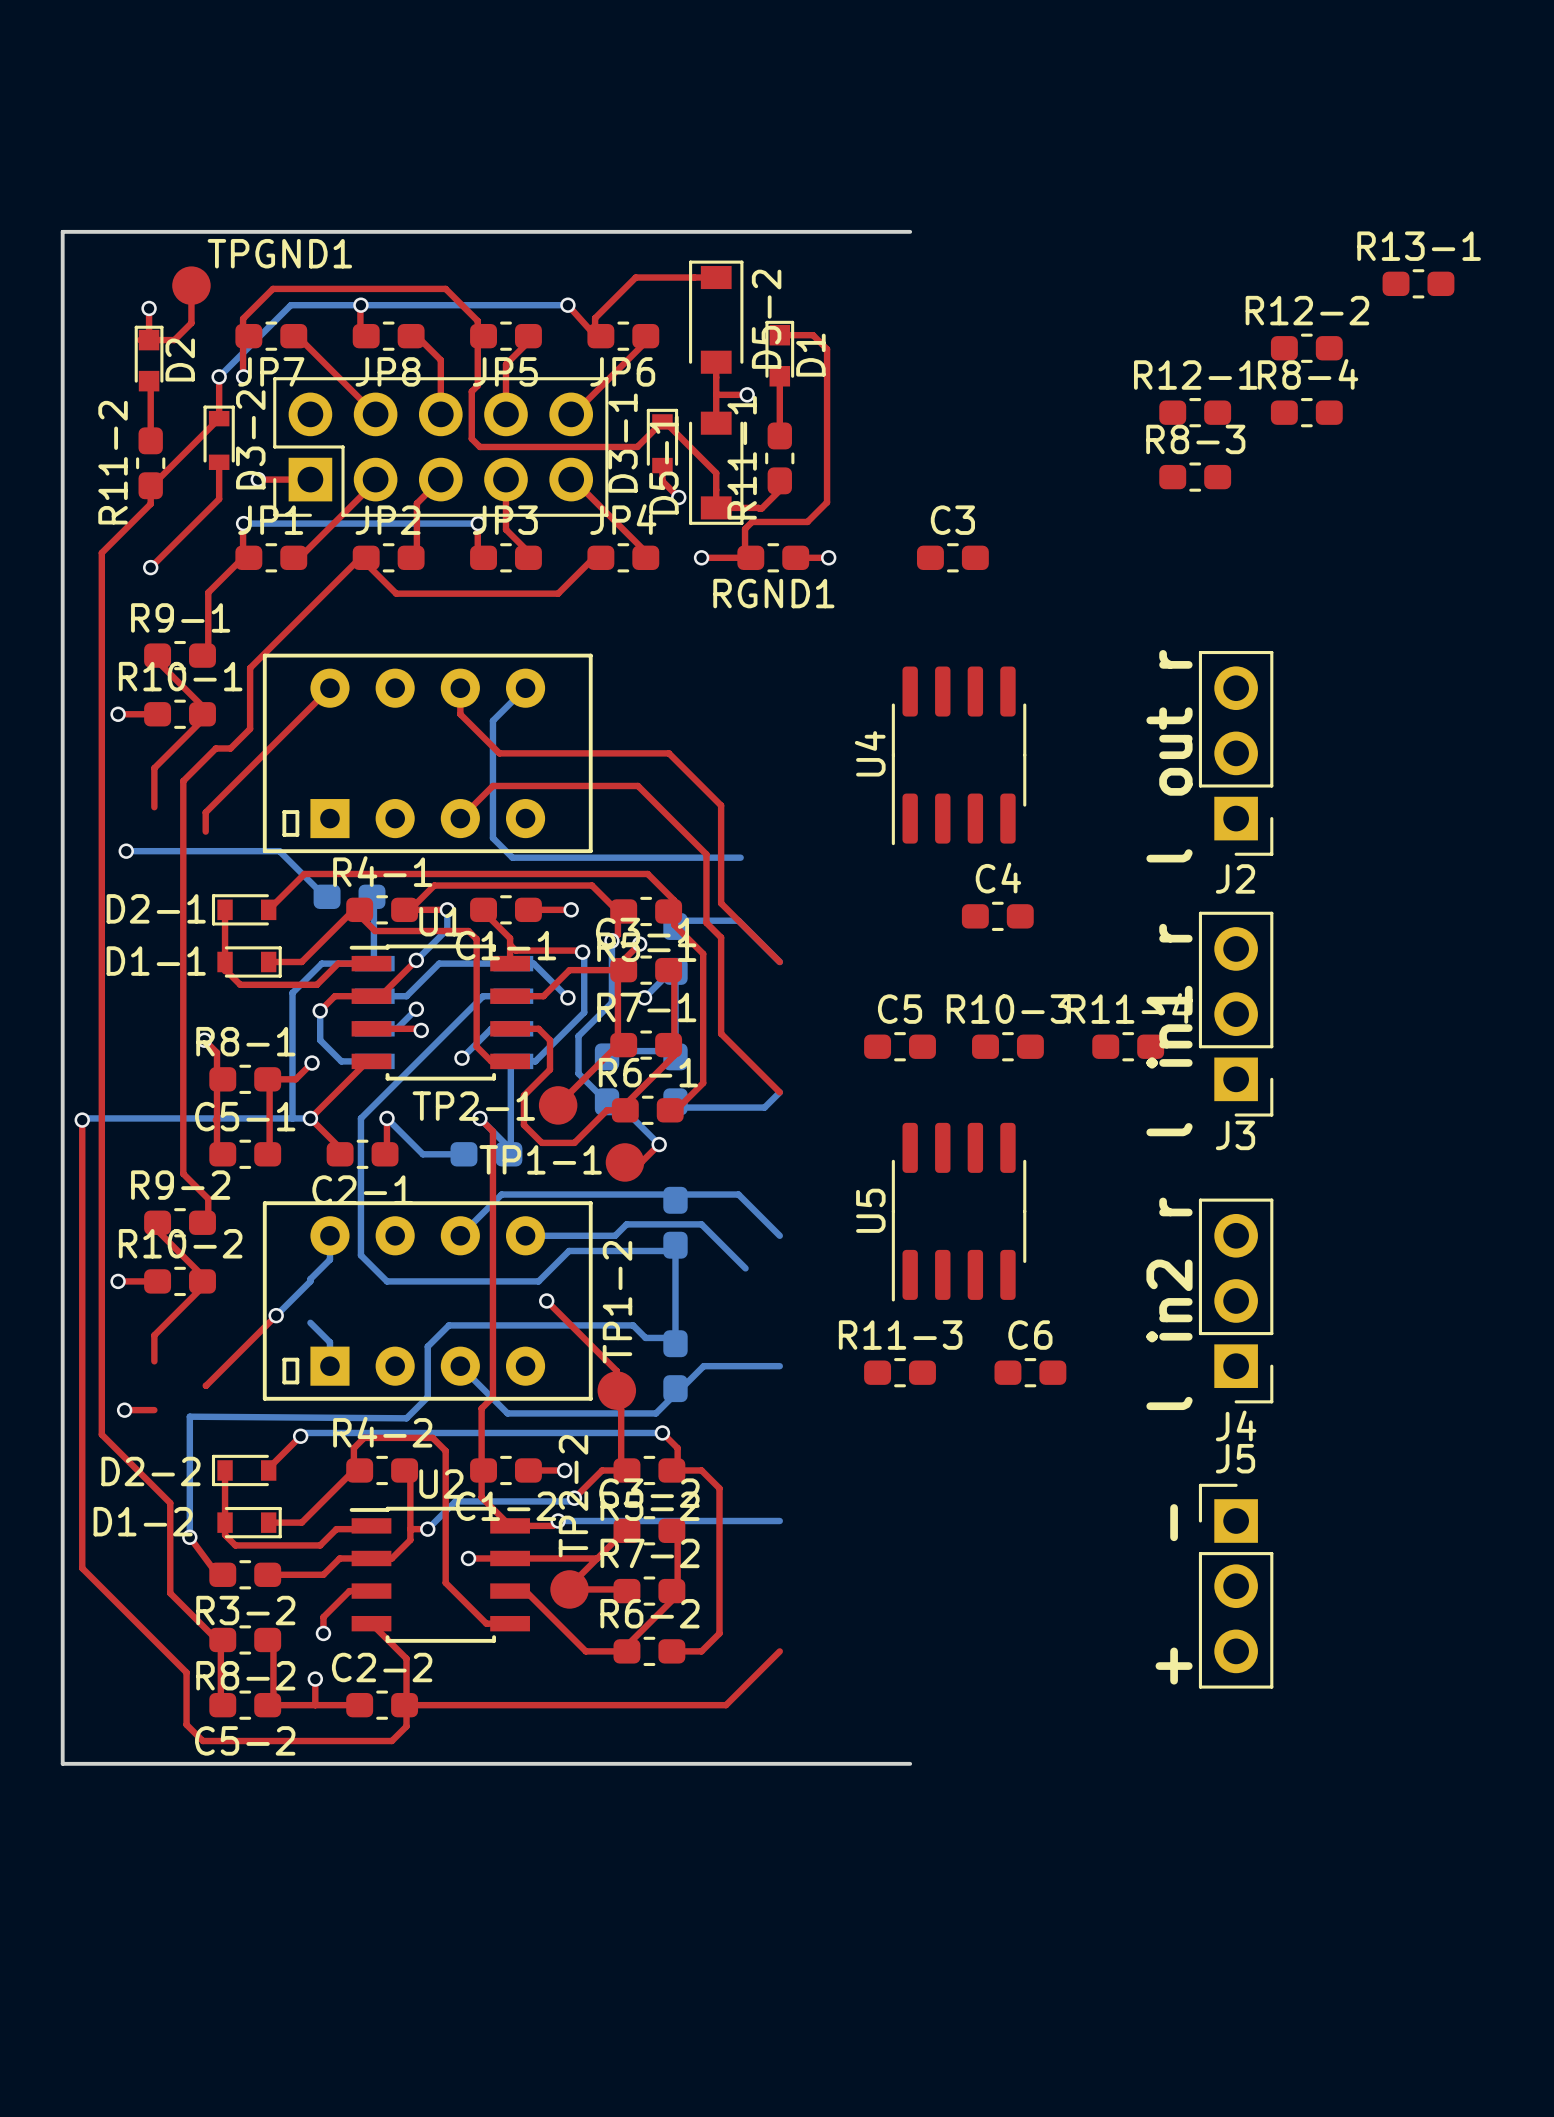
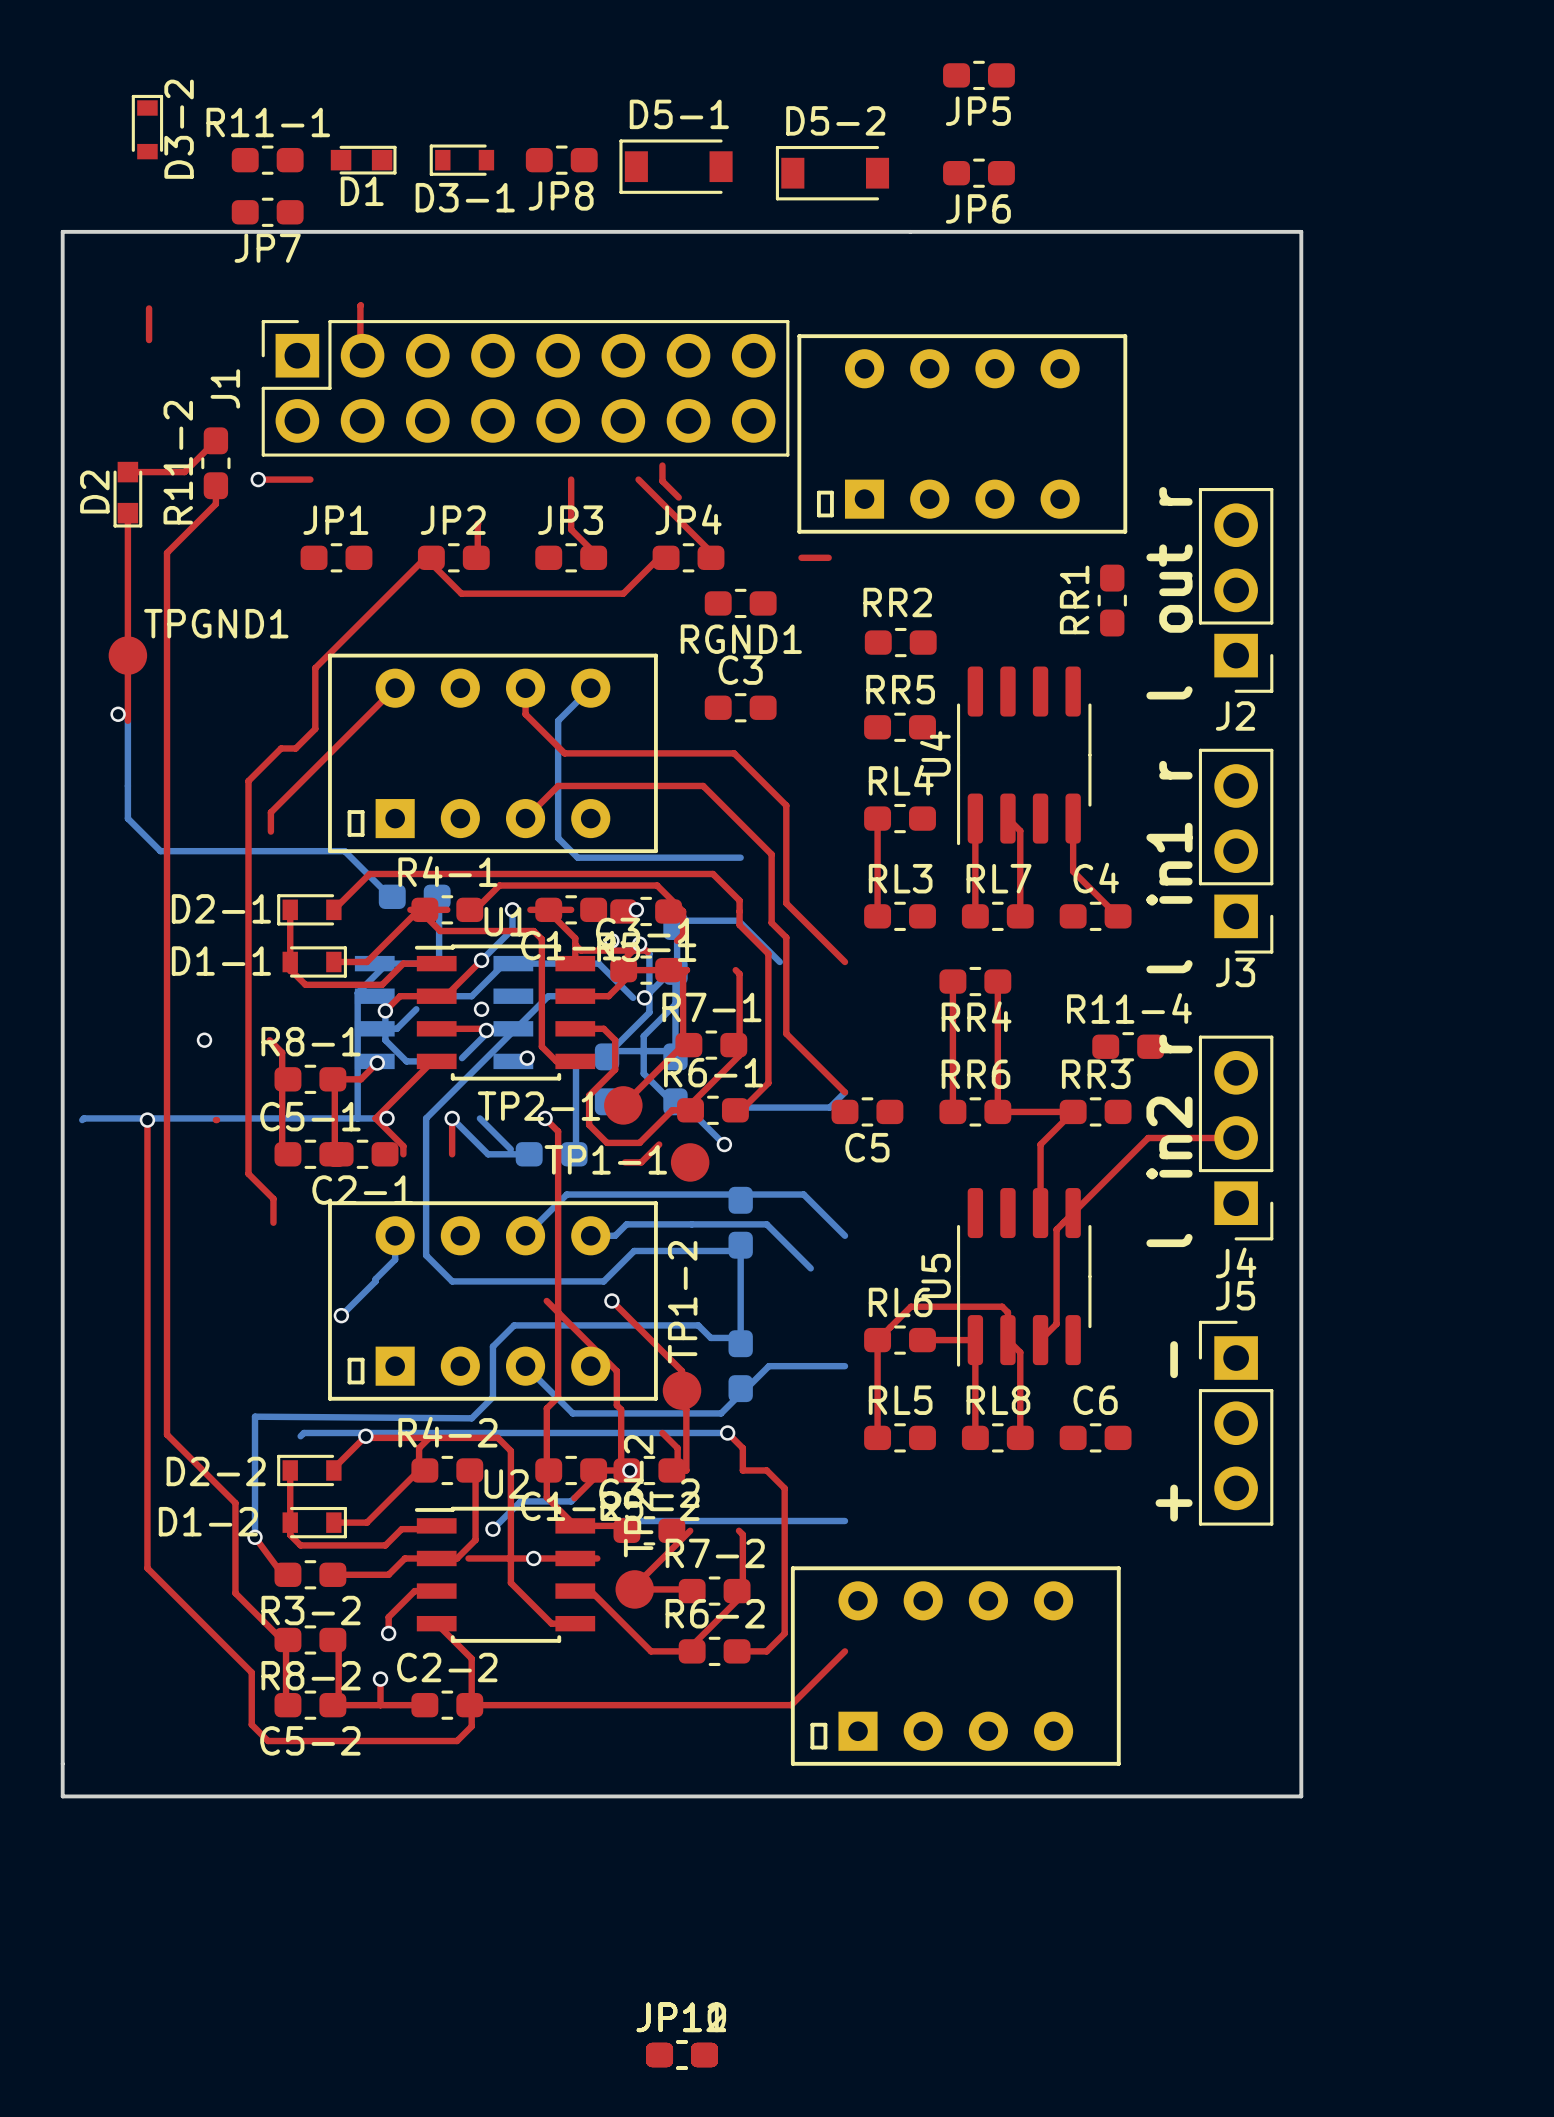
top track: (716, 277) (635, 277) (595, 318) (595, 336) (567, 305) -> none
R13-1: (1418, 283) -> none
top track: (191, 285) (191, 323) (174, 340) (139, 340) -> none
TPGND1 position: (191, 285) -> (127, 655)
via: (360, 305) -> none
bottom track: (567, 305) (290, 305) (219, 376) -> none
via: (567, 305) -> none
via: (149, 308) -> none
D5-2 rotation: 0° (716, 317) -> 90° counterclockwise (832, 173)
D5-2 position: (716, 317) -> (832, 173)
top track: (779, 335) (813, 335) (827, 349) (827, 502) (807, 521) (752, 521) (745, 529) (745, 557) (701, 557) -> none
JP7 position: (271, 336) -> (267, 212)
top track: (299, 336) (299, 338) (375, 414) -> none
JP8 position: (388, 336) -> (561, 160)
top track: (416, 336) (440, 360) (440, 414) -> none
JP5 position: (505, 336) -> (978, 75)
top track: (534, 336) (505, 364) (505, 414) -> none
JP6 position: (623, 336) -> (978, 173)
top track: (651, 336) (573, 414) -> none
R12-2: (1306, 348) -> none
D1 rotation: 0° (779, 353) -> 90° clockwise (363, 160)
D1 position: (779, 353) -> (363, 160)
D2 rotation: 0° (149, 358) -> 180° (127, 494)
D2 position: (149, 358) -> (127, 494)
top track: (716, 362) (716, 421) -> none
top track: (219, 376) (219, 418) (150, 487) (150, 504) (101, 552) (101, 1434) (170, 1503) (170, 1593) (220, 1643) (220, 1705) -> none
via: (219, 376) -> none
top track: (243, 376) (243, 318) (272, 288) (445, 288) (477, 320) (477, 385) (471, 391) (471, 438) (479, 446) (637, 446) (662, 421) (665, 421) (716, 473) (716, 507) (761, 508) (779, 490) (779, 486) -> none
via: (243, 376) -> none
top track: (779, 376) (779, 430) -> none
top track: (149, 381) (150, 382) (150, 435) -> none
J1: none -> (525, 388)
top track: (716, 394) (747, 394) -> none
via: (747, 394) -> none
R12-1: (1195, 412) -> none
R8-4: (1306, 412) -> none
part: none -> (962, 433)
D3-2 position: (219, 437) -> (147, 127)
top track: none -> (215, 440) (184, 472) (127, 472)
D3-1 rotation: 0° (662, 441) -> 90° counterclockwise (461, 160)
D3-1 position: (662, 441) -> (461, 160)
part: (440, 446) -> none
R11-1 rotation: 0° (779, 458) -> 90° clockwise (267, 160)
R11-1 position: (779, 458) -> (267, 160)
top track: (219, 462) (219, 499) (150, 567) -> none
R11-2 position: (150, 463) -> (215, 463)
D5-1 rotation: 0° (716, 468) -> 90° clockwise (676, 166)
D5-1 position: (716, 468) -> (676, 166)
R8-3: (1195, 477) -> none
top track: (440, 479) (416, 503) (416, 557) -> none
top track: (505, 479) (505, 529) (534, 557) -> (571, 479) (571, 529) (599, 557)
top track: (573, 479) (651, 557) -> (638, 479) (716, 557)
top track: (375, 481) (299, 557) -> none
top track: none -> (215, 487) (215, 504) (167, 552) (167, 1434) (235, 1503) (235, 1593) (286, 1643) (286, 1705)
text: none -> r (1175, 496)
via: (678, 497) -> none
top track: none -> (127, 513) (127, 720)
top track: (243, 523) (243, 557) (208, 592) (208, 655) -> none
bottom track: (243, 523) (478, 523) -> none
via: (243, 523) -> none
via: (478, 523) -> none
JP1 position: (271, 557) -> (336, 557)
JP2 position: (388, 557) -> (453, 557)
JP3 position: (505, 557) -> (571, 557)
top track: (595, 557) (558, 593) -> (660, 557) (623, 593) (558, 593)
JP4 position: (623, 557) -> (688, 557)
via: (701, 557) -> none
RGND1 position: (773, 557) -> (740, 603)
via: (828, 557) -> none
C3 position: (952, 557) -> (740, 707)
via: (150, 567) -> none
top track: (461, 593) (396, 593) (360, 557) (250, 668) (250, 728) (230, 748) (215, 748) (183, 781) (183, 1173) (208, 1198) (208, 1222) -> (461, 593) (425, 557) (315, 668) (315, 728) (295, 748) (281, 748) (248, 781) (248, 1173) (273, 1198) (273, 1222)
RR1: none -> (1112, 600)
RR2: none -> (900, 642)
top track: (151, 655) (208, 712) (208, 714) (154, 768) (154, 807) -> none
R9-1: (180, 655) -> none
text: r (1175, 659) -> none
top track: (329, 688) (205, 812) (205, 831) -> (395, 688) (270, 812) (270, 831)
top track: (460, 688) (460, 714) (499, 753) (564, 753) -> (525, 688) (525, 714) (564, 753)
bottom track: (525, 688) (492, 720) (492, 838) (512, 857) (577, 857) -> (590, 688) (558, 720) (558, 838) (577, 857)
text: none -> l (1169, 692)
top track: (118, 714) (151, 714) -> none
R10-1: (180, 714) -> none
RR5: none -> (900, 727)
text position: out (1169, 751) -> out (1169, 588)
part position: (427, 753) -> (492, 753)
top track: (668, 753) (721, 805) (721, 903) (779, 961) -> (668, 753) (734, 753) (786, 805) (786, 903) (844, 961)
J2 position: (1236, 753) -> (1236, 590)
U4 position: (959, 755) -> (1024, 755)
text: none -> r (1175, 770)
top track: (558, 785) (492, 785) (460, 818) -> (558, 785) (525, 818)
top track: (638, 785) (706, 854) (706, 922) (721, 937) (721, 1033) (779, 1092) -> (638, 785) (703, 785) (771, 854) (771, 922) (786, 937) (786, 1033) (844, 1092)
top track: none -> (877, 818) (877, 916)
RL4: none -> (900, 818)
top track: none -> (975, 818) (975, 916)
top track: none -> (1007, 818) (1020, 830) (1020, 916)
top track: none -> (1073, 818) (1073, 871) (1118, 916)
bottom track: (126, 851) (160, 851) -> (127, 720) (127, 818) (160, 851)
via: (126, 851) -> none
bottom track: (279, 851) (325, 896) -> (279, 851) (344, 851) (390, 896)
text: l (1169, 855) -> none
top track: (369, 873) (304, 873) (268, 909) -> (369, 873) (333, 909)
top track: (647, 873) (674, 900) (674, 925) (703, 953) (703, 1083) (676, 1110) -> (647, 873) (712, 873) (739, 900) (739, 925) (768, 953) (768, 1083) (741, 1110)
C4 name: C4 (998, 878) -> RL7 (999, 878)
top track: (499, 885) (434, 885) (410, 909) -> (499, 885) (475, 909)
top track: (591, 885) (617, 911) (617, 934) (611, 940) -> (591, 885) (657, 885) (683, 911) (683, 934) (677, 940)
part position: (349, 896) -> (414, 896)
bottom track: (373, 896) (374, 963) (321, 963) (292, 992) (292, 1118) -> none
top track: (225, 909) (225, 971) -> (290, 909) (290, 971)
D2-1 position: (244, 909) -> (309, 909)
R4-1 position: (382, 909) -> (447, 909)
bottom track: (447, 909) (447, 929) (416, 960) -> (512, 909) (512, 929) (481, 960)
via: (447, 909) -> none
top track: (481, 909) (510, 938) (510, 963) -> (546, 909) (575, 938) (575, 963)
C1-1 position: (505, 909) -> (571, 909)
via: none -> (512, 909)
via: (571, 909) -> none
via: none -> (636, 909)
RL3: none -> (900, 916)
C4: none -> (1095, 916)
top track: (440, 931) (375, 931) (353, 909) (301, 961) (268, 961) -> (440, 931) (419, 909) (366, 961) (333, 961)
top track: (468, 931) (476, 939) (476, 1046) (491, 1061) (510, 1061) -> (468, 931) (533, 931) (541, 939) (541, 1046) (556, 1061) (575, 1061)
text: r (1175, 933) -> none
bottom track: (611, 940) (611, 1002) (578, 1036) (578, 1073) (607, 1102) (607, 1107) (622, 1107) (659, 1144) -> none
bottom track: none -> (677, 940) (677, 1002) (643, 1036) (643, 1073) (672, 1102) (672, 1107) (675, 1107)
top track: (510, 944) (515, 950) (580, 950) (582, 952) -> (575, 944) (580, 950) (646, 950) (647, 952)
bottom track: (582, 952) (584, 953) (584, 1012) (535, 1061) (513, 1061) (510, 1063) (510, 1154) -> (647, 952) (649, 953) (649, 1012) (600, 1061) (578, 1061) (576, 1063) (576, 1154)
via: (582, 952) -> none
top track: (416, 960) (380, 996) (334, 996) (320, 1010) -> (481, 960) (445, 996) (400, 996) (385, 1010)
via: (416, 960) -> none
via: none -> (481, 960)
D1-1 position: (249, 961) -> (314, 961)
top track: (371, 963) (338, 963) (316, 984) -> (436, 963) (403, 963) (382, 984) (316, 984)
bottom track: (439, 963) (504, 963) -> (439, 996) (471, 996) (504, 963)
bottom track: (439, 963) (406, 996) (374, 996) -> (439, 963) (439, 896)
bottom track: none -> (439, 963) (387, 963) (357, 992) (357, 1118)
bottom track: (533, 963) (567, 997) -> (533, 963) (598, 963) (633, 997)
text: none -> l (1169, 966)
top track: (225, 969) (240, 984) (305, 984) -> (290, 969) (305, 984)
top track: (670, 970) (674, 973) (674, 1055) (619, 1110) (607, 1110) (574, 1142) (541, 1142) (523, 1124) (523, 1095) (549, 1069) (549, 1040) (538, 1028) (510, 1028) -> (735, 970) (739, 973) (739, 1055) (684, 1110) (672, 1110) (639, 1142) (607, 1142) (589, 1124) (589, 1095) (615, 1069) (615, 1040) (603, 1028) (575, 1028)
top track: none -> (952, 981) (952, 1111)
RR4: none -> (975, 981)
top track: none -> (997, 981) (997, 1111) (1073, 1111) (1040, 1144) (1040, 1213)
top track: (510, 996) (543, 996) (569, 970) (621, 970) (617, 973) (617, 1045) (558, 1105) -> (575, 996) (608, 996) (634, 970) (686, 970) (683, 973) (683, 1045) (623, 1105)
bottom track: (513, 996) (483, 996) (360, 1118) (360, 1255) (387, 1281) (452, 1281) -> (578, 996) (548, 996) (426, 1118) (426, 1255) (452, 1281)
via: (567, 997) -> none
via: (416, 1009) -> none
via: none -> (481, 1009)
C5 name position: C5 (900, 1009) -> C5 (867, 1147)
bottom track: (320, 1010) (320, 1040) (341, 1061) (374, 1061) -> (385, 1010) (385, 1040) (406, 1061) (439, 1061)
via: (320, 1010) -> none
via: none -> (385, 1010)
U1 position: (439, 1012) -> (505, 1012)
J3 position: (1236, 1014) -> (1236, 851)
text position: in1 (1169, 1027) -> in1 (1169, 864)
top track: (371, 1028) (419, 1028) (421, 1030) -> (436, 1028) (484, 1028) (486, 1030)
via: (421, 1030) -> none
via: none -> (486, 1030)
top track: (204, 1040) (217, 1052) (217, 1150) (220, 1154) -> (269, 1040) (282, 1052) (282, 1150) (286, 1154)
text: none -> r (1175, 1043)
R7-1 position: (646, 1045) -> (711, 1045)
C5 position: (900, 1046) -> (867, 1111)
R10-3: (1007, 1046) -> none
via: (461, 1058) -> none
via: none -> (527, 1058)
top track: (371, 1061) (367, 1061) (310, 1118) (338, 1146) (338, 1154) -> (436, 1061) (432, 1061) (375, 1118) (403, 1146) (403, 1154)
top track: (312, 1063) (295, 1079) (273, 1079) (269, 1083) (269, 1154) -> (377, 1063) (360, 1079) (338, 1079) (334, 1083) (334, 1154)
via: (312, 1063) -> none
via: none -> (377, 1063)
R8-1 position: (245, 1079) -> (310, 1079)
bottom track: (779, 1092) (764, 1107) -> (844, 1092) (829, 1107) (764, 1107)
TP2-1 position: (558, 1105) -> (623, 1105)
bottom track: (687, 1107) (740, 1107) -> (687, 1107) (724, 1144)
R6-1 position: (647, 1110) -> (712, 1110)
RR6: none -> (975, 1111)
RR3: none -> (1095, 1111)
bottom track: none -> (310, 1118) (375, 1118)
via: (310, 1118) -> none
top track: (386, 1118) (386, 1154) -> (452, 1118) (452, 1154)
bottom track: (387, 1118) (422, 1154) (462, 1154) -> (452, 1118) (488, 1154) (527, 1154)
top track: (479, 1118) (492, 1131) (492, 1397) (481, 1408) (481, 1497) (510, 1525) (553, 1525) (558, 1521) -> (545, 1118) (558, 1131) (558, 1397) (546, 1408) (546, 1497) (575, 1525) (618, 1525) (623, 1521)
via position: (479, 1118) -> (452, 1118)
via: none -> (545, 1118)
top track: (82, 1120) (82, 1568) (186, 1672) (186, 1724) (202, 1741) (268, 1741) -> (147, 1120) (147, 1568) (251, 1672) (251, 1724) (268, 1741)
via position: (82, 1120) -> (147, 1120)
text: l (1169, 1129) -> none
top track: none -> (1236, 1138) (1148, 1138) (1056, 1229) (1056, 1324) (1040, 1340)
via: (659, 1144) -> none
via: none -> (724, 1144)
C5-1 position: (245, 1154) -> (310, 1154)
part position: (486, 1154) -> (551, 1154)
TP1-1 position: (624, 1162) -> (690, 1162)
bottom track: (566, 1194) (501, 1194) (460, 1235) -> none
bottom track: (738, 1194) (779, 1235) -> (738, 1194) (803, 1194) (844, 1235)
text: r (1175, 1206) -> none
U5 position: (959, 1212) -> (1024, 1277)
top track: (151, 1222) (151, 1224) (208, 1281) (154, 1335) (154, 1361) -> none
R9-2: (180, 1222) -> none
part position: (675, 1222) -> (740, 1222)
bottom track: (701, 1224) (745, 1268) -> (701, 1224) (766, 1224) (810, 1268)
bottom track: (329, 1235) (329, 1259) (276, 1315) -> (395, 1235) (395, 1259) (341, 1315)
bottom track: (525, 1235) (590, 1235) -> (525, 1235) (566, 1194)
text: none -> l (1169, 1240)
bottom track: (634, 1250) (569, 1250) (538, 1281) -> (634, 1250) (603, 1281) (538, 1281)
bottom track: (675, 1250) (675, 1337) (645, 1337) (633, 1325) -> (675, 1250) (740, 1250) (740, 1337) (710, 1337) (698, 1325) (633, 1325)
top track: (118, 1281) (151, 1281) -> none
via: (118, 1281) -> none
R10-2: (180, 1281) -> none
part position: (427, 1300) -> (492, 1300)
via position: (546, 1300) -> (611, 1300)
top track: none -> (611, 1300) (682, 1371) (682, 1405) (686, 1409) (686, 1470)
text position: in2 (1169, 1300) -> in2 (1169, 1138)
J4 position: (1236, 1300) -> (1236, 1138)
top track: (276, 1315) (206, 1385) -> none
via: (276, 1315) -> none
via: none -> (341, 1315)
bottom track: (310, 1322) (329, 1342) (329, 1366) -> none
bottom track: (514, 1325) (448, 1325) (427, 1346) (427, 1397) (406, 1418) (189, 1416) (189, 1537) -> (514, 1325) (492, 1346) (492, 1397) (471, 1418) (255, 1416) (255, 1537)
RL6: none -> (900, 1340)
top track: none -> (922, 1340) (975, 1340) (975, 1437)
bottom track: (460, 1366) (507, 1413) (572, 1413) -> (525, 1366) (572, 1413)
part position: (675, 1366) -> (740, 1366)
bottom track: (768, 1366) (703, 1366) (655, 1413) -> (768, 1366) (721, 1413) (655, 1413)
bottom track: none -> (779, 1366) (844, 1366)
R11-3: (900, 1372) -> none
C6 position: (1030, 1372) -> (1095, 1437)
TP1-2 position: (616, 1390) -> (682, 1390)
text: l (1169, 1403) -> none
top track: (124, 1410) (154, 1410) -> none
via: (124, 1410) -> none
via: (662, 1432) -> none
top track: none -> (727, 1432) (742, 1448) (742, 1470) (766, 1470) (784, 1488) (784, 1633) (766, 1651) (742, 1651)
via: none -> (727, 1432)
top track: (300, 1436) (268, 1468) (268, 1470) -> none
via: (300, 1436) -> none
via: none -> (365, 1436)
top track: none -> (429, 1437) (419, 1448) (419, 1470) (366, 1522) (333, 1522)
top track: (432, 1437) (445, 1450) (445, 1582) (486, 1623) (510, 1623) -> (432, 1437) (497, 1437) (510, 1450) (510, 1582) (551, 1623) (575, 1623)
top track: none -> (877, 1437) (877, 1340) (910, 1306) (1002, 1306) (1007, 1312) (1007, 1340) (1020, 1352) (1020, 1437)
RL5: none -> (900, 1437)
RL8: none -> (997, 1437)
top track: (353, 1448) (353, 1470) (301, 1522) (268, 1522) -> (353, 1448) (333, 1468) (333, 1470)
top track: (225, 1470) (225, 1535) (235, 1545) (300, 1545) -> (290, 1470) (290, 1535) (300, 1545)
D2-2 position: (244, 1470) -> (309, 1470)
R4-2 position: (382, 1470) -> (447, 1470)
top track: (410, 1470) (410, 1540) (391, 1558) (339, 1558) (323, 1574) (273, 1574) -> (475, 1470) (475, 1540) (457, 1558) (404, 1558) (388, 1574) (338, 1574)
C1-2 position: (505, 1470) -> (571, 1470)
top track: (530, 1470) (564, 1470) -> none
via: (564, 1470) -> none
via: none -> (629, 1470)
top track: (686, 1470) (701, 1470) (719, 1488) (719, 1633) (701, 1651) (686, 1651) -> (738, 1530) (742, 1534) (742, 1594) (686, 1651)
via: (574, 1498) -> none
bottom track: (520, 1501) (455, 1501) (427, 1529) -> (520, 1501) (492, 1529)
bottom track: (558, 1521) (623, 1521) -> (662, 1432) (727, 1432)
via: (558, 1521) -> none
bottom track: none -> (779, 1521) (844, 1521)
D1-2 position: (249, 1522) -> (314, 1522)
text position: - (1174, 1522) -> - (1174, 1359)
top track: (371, 1525) (368, 1529) (336, 1529) (320, 1545) -> (410, 1529) (401, 1529) (385, 1545) (320, 1545)
via: (427, 1529) -> none
via: none -> (492, 1529)
top track: (625, 1530) (569, 1586) (569, 1589) (619, 1589) (621, 1591) -> (690, 1530) (634, 1586) (634, 1589) (684, 1589) (686, 1591)
top track: (673, 1530) (677, 1534) (677, 1594) (621, 1651) (585, 1651) (525, 1591) (510, 1591) -> none
top track: (189, 1537) (217, 1574) -> (255, 1537) (282, 1574)
via: (189, 1537) -> none
via: none -> (255, 1537)
via: (468, 1558) -> none
via: none -> (533, 1558)
R3-2 position: (245, 1574) -> (310, 1574)
U2 position: (439, 1574) -> (505, 1574)
J5 position: (1236, 1586) -> (1236, 1423)
TP2-2 position: (569, 1589) -> (634, 1589)
top track: (371, 1591) (349, 1591) (323, 1617) (323, 1633) -> (436, 1591) (414, 1591) (388, 1617) (388, 1633)
top track: none -> (575, 1591) (590, 1591) (651, 1651) (677, 1651)
R7-2 position: (649, 1591) -> (714, 1591)
top track: (371, 1623) (406, 1658) (406, 1726) (391, 1741) -> (436, 1623) (471, 1658) (471, 1726) (457, 1741) (391, 1741)
via: (323, 1633) -> none
via: none -> (388, 1633)
top track: (274, 1638) (273, 1701) (269, 1705) (334, 1705) -> (339, 1638) (338, 1701) (334, 1705)
R8-2 position: (245, 1639) -> (310, 1639)
R6-2 position: (649, 1651) -> (714, 1651)
top track: (779, 1651) (726, 1705) -> (844, 1651) (791, 1705) (726, 1705)
part: none -> (955, 1666)
text position: + (1174, 1666) -> + (1174, 1503)
top track: (315, 1679) (315, 1705) -> (380, 1679) (380, 1705)
via: (315, 1679) -> none
via: none -> (380, 1679)
C5-2 position: (245, 1705) -> (310, 1705)
C2-2 position: (382, 1705) -> (447, 1705)
top track: (422, 1705) (471, 1705) -> (357, 1705) (406, 1705)
board edge: (62, 1763) (910, 1763) -> (62, 1763) (62, 1796) (1301, 1796) (1301, 231) (910, 231)
part: none -> (682, 2055)
part: none -> (682, 2055)
part: none -> (682, 2055)

